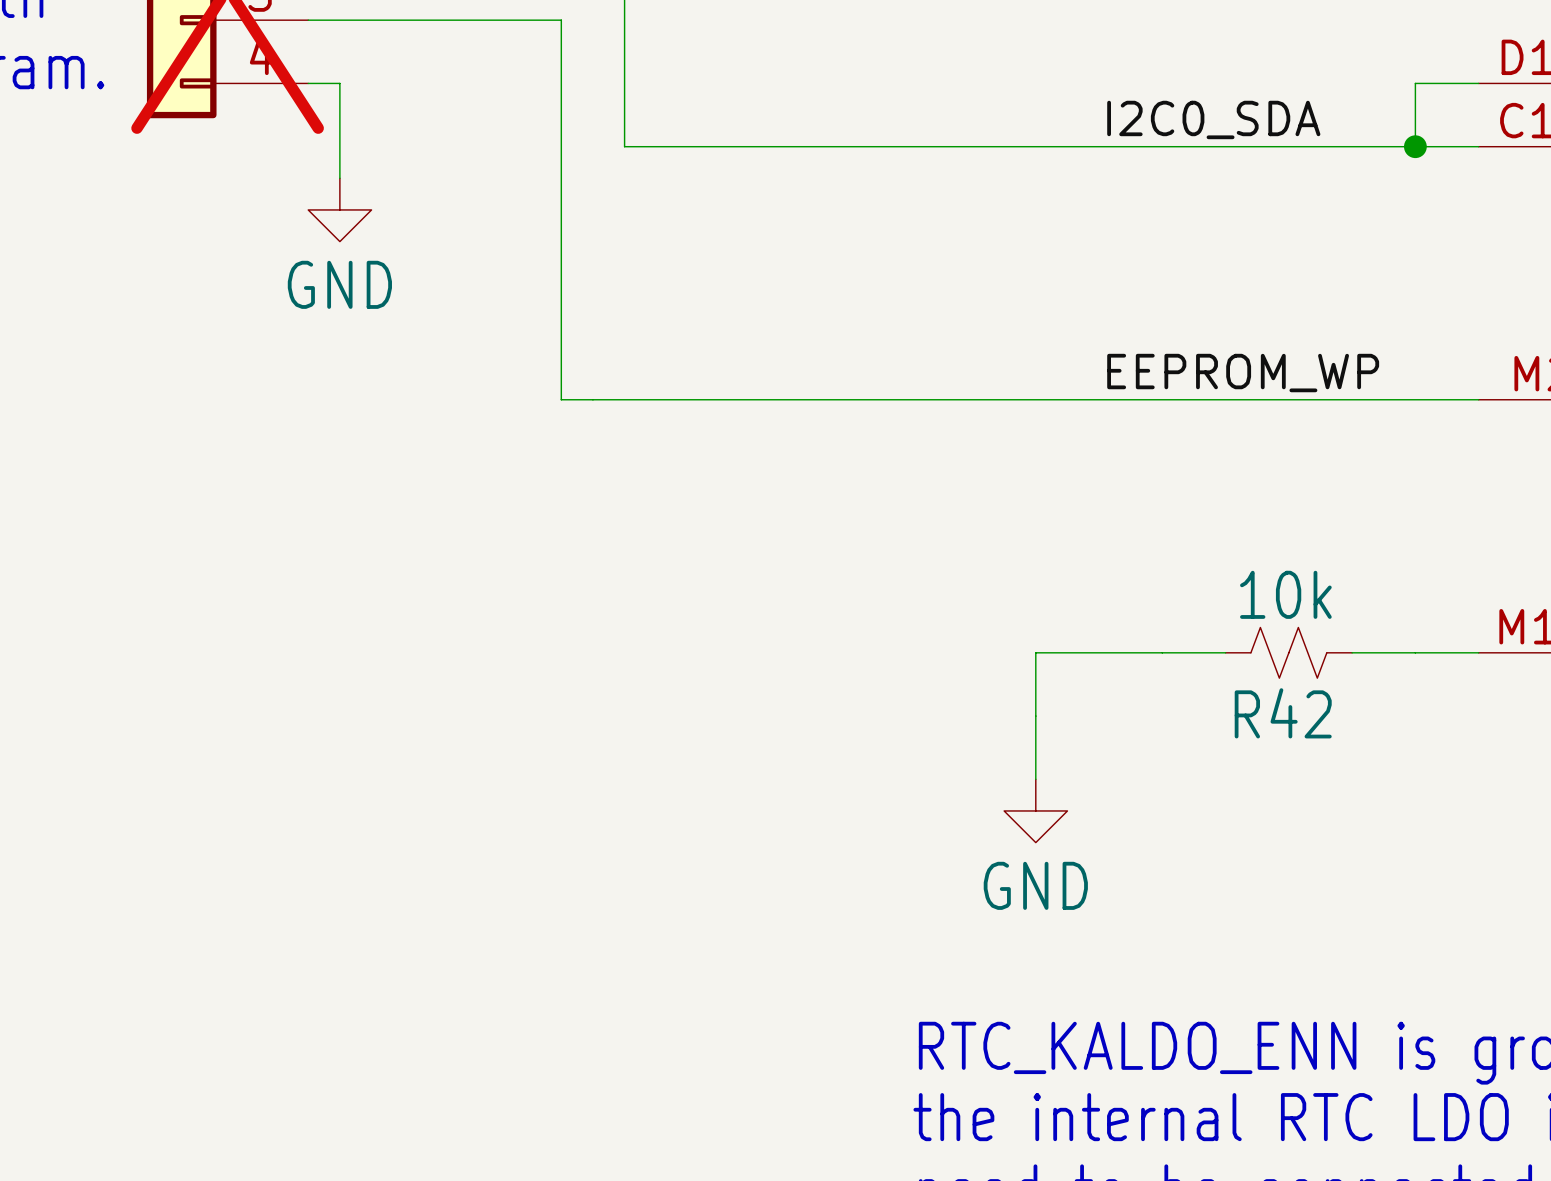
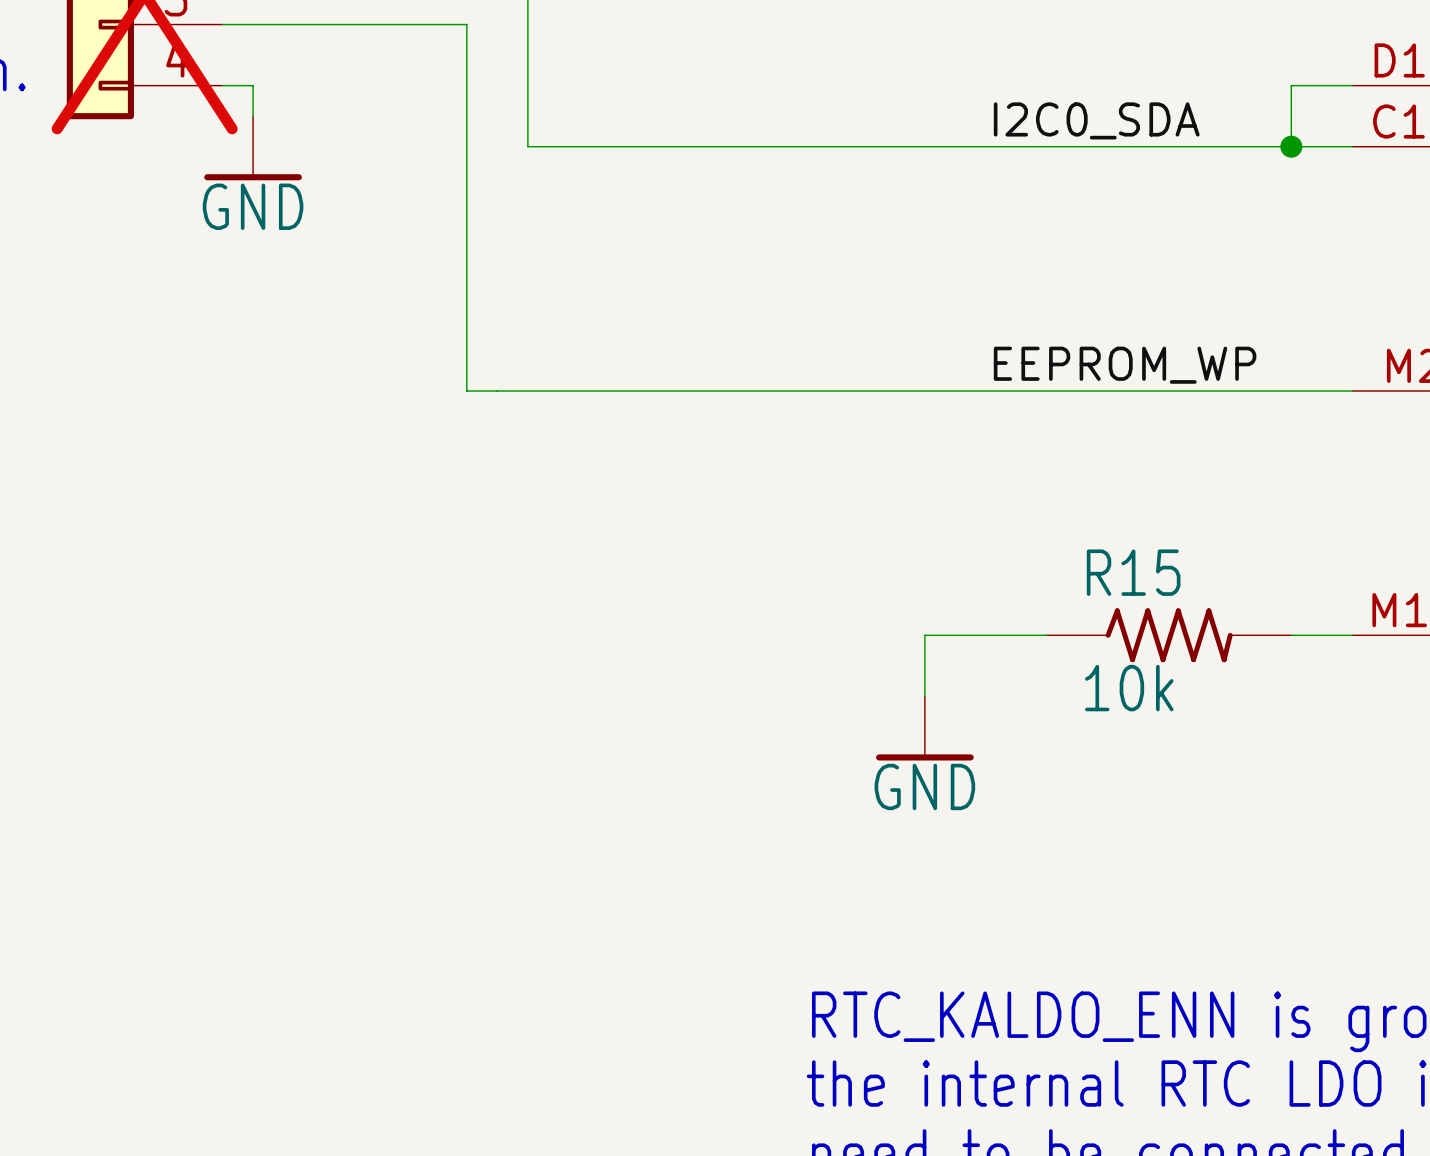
power symbol: none -> GND (253, 148)
power symbol: GND (339, 209) -> none
R42: 10k (1288, 652) -> none
R15: none -> 10k (1169, 635)
power symbol: none -> GND (924, 728)
power symbol: GND (1035, 810) -> none

